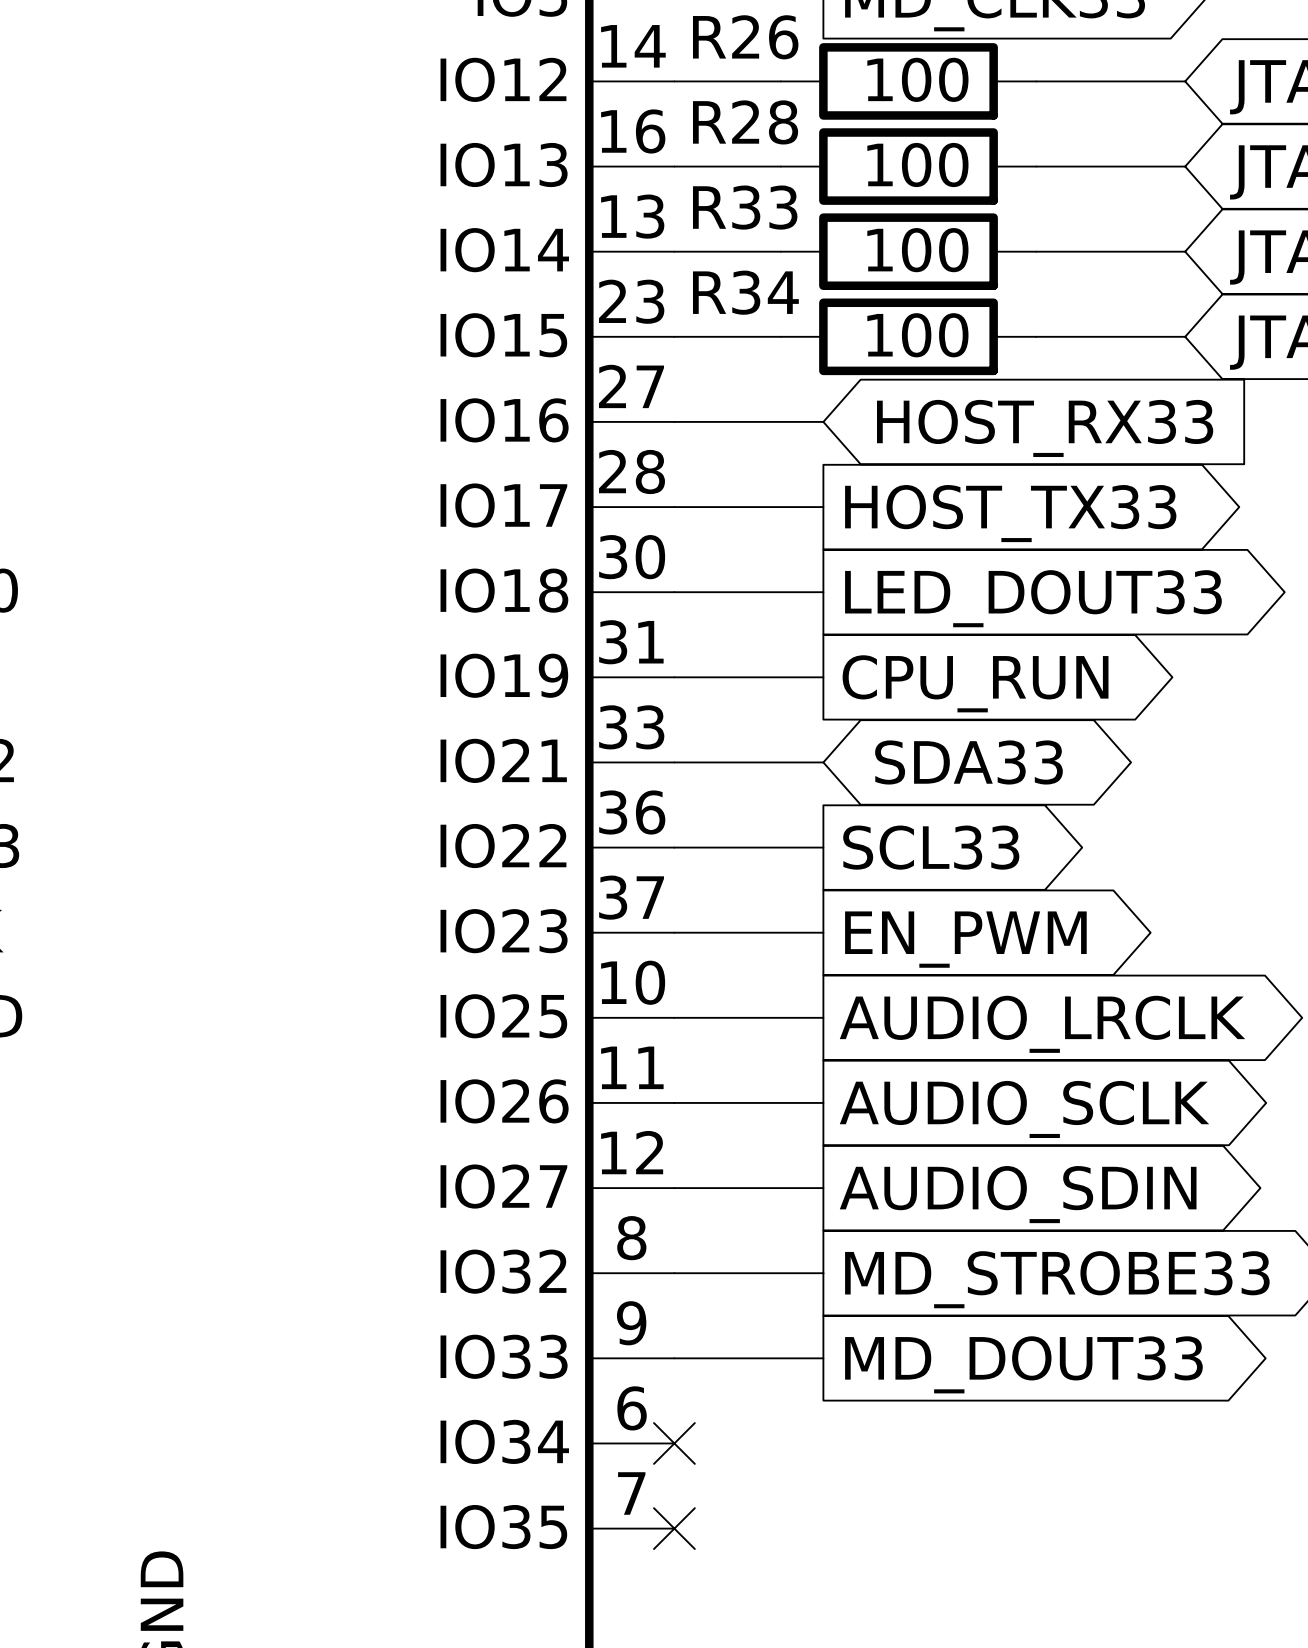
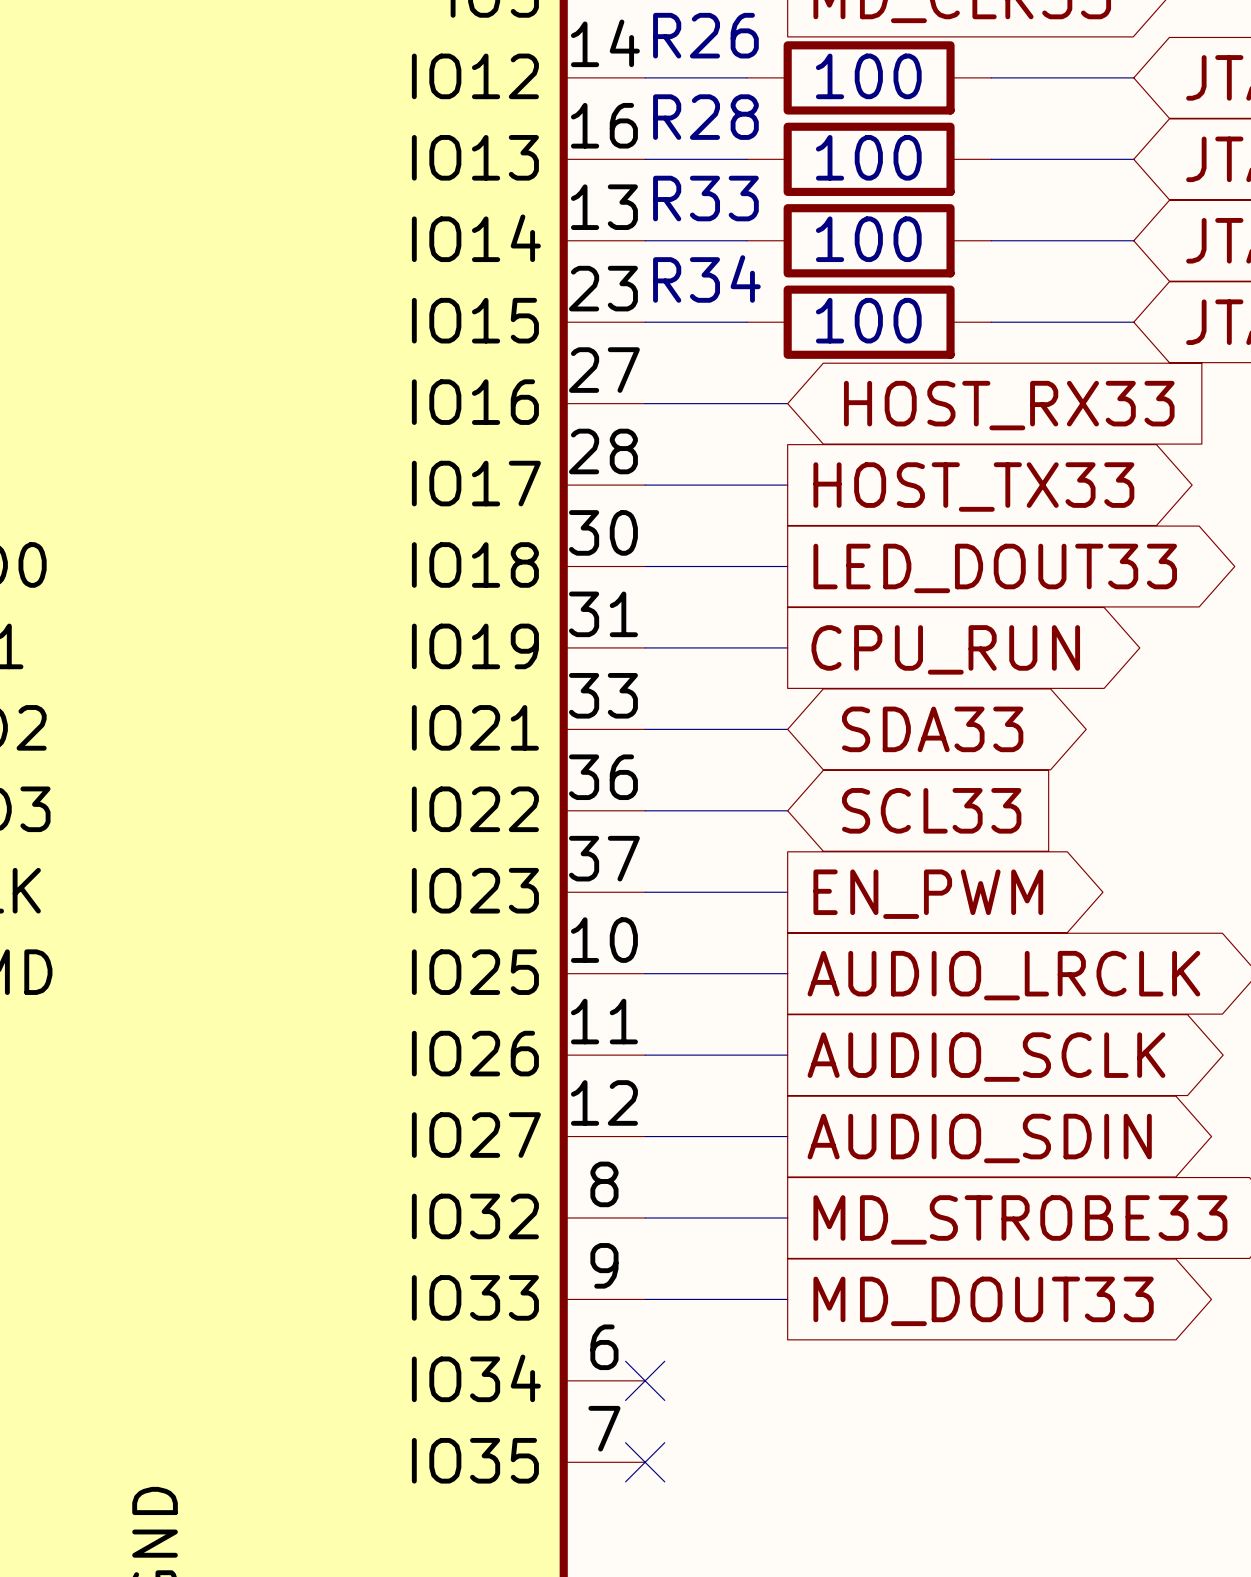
global label shape: output (931, 847) -> input (931, 810)

